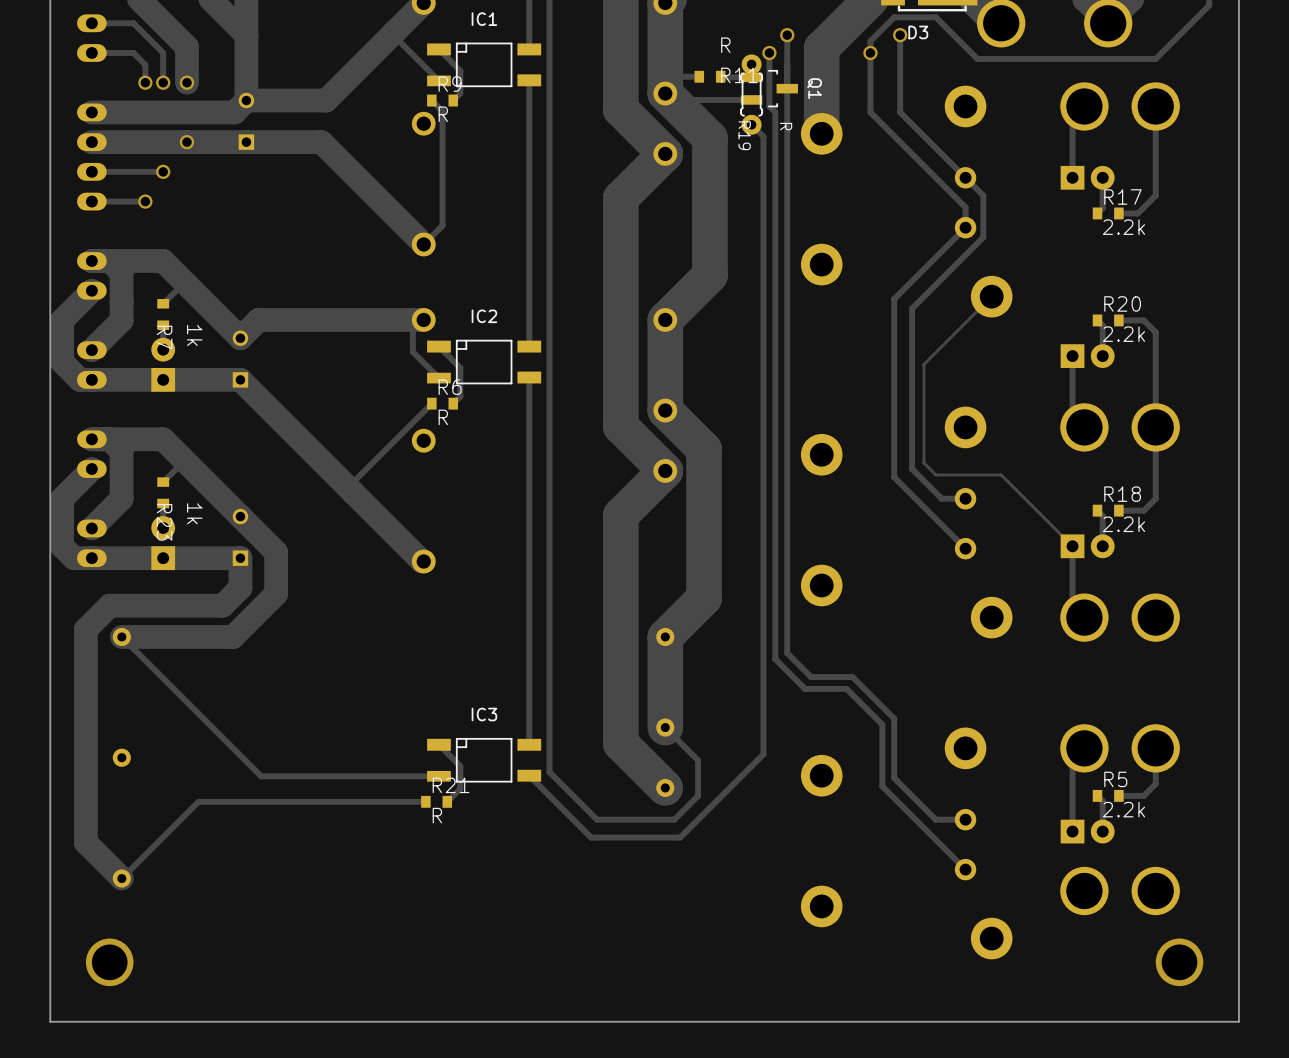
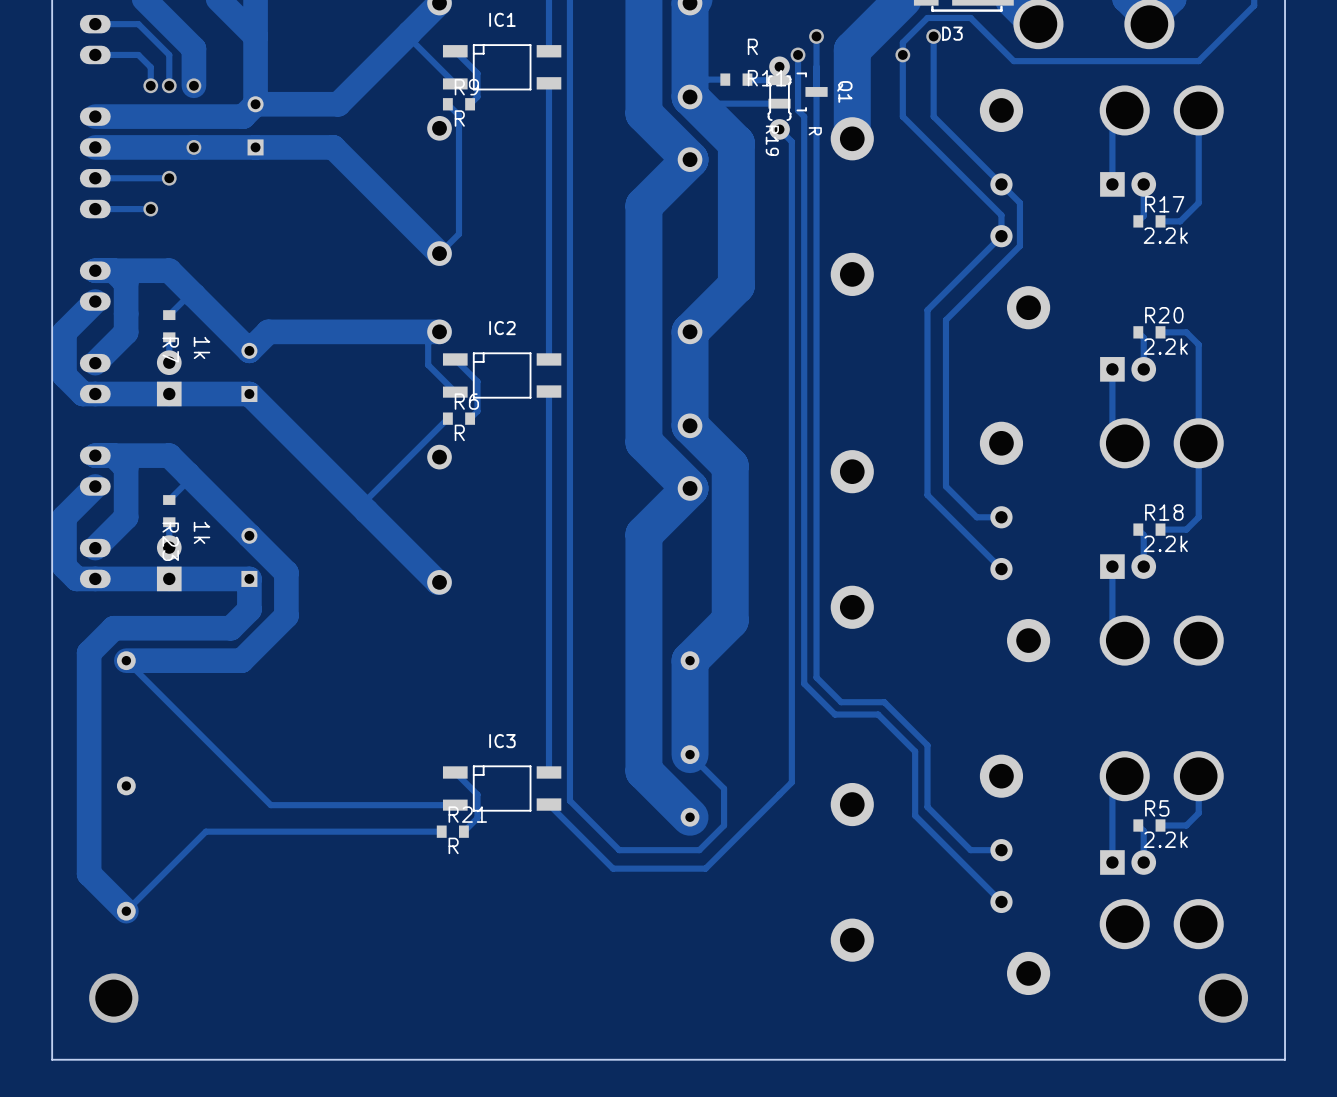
track: (991, 296) (923, 364) (923, 463) (935, 474) (1001, 474) (1072, 546) -> none

